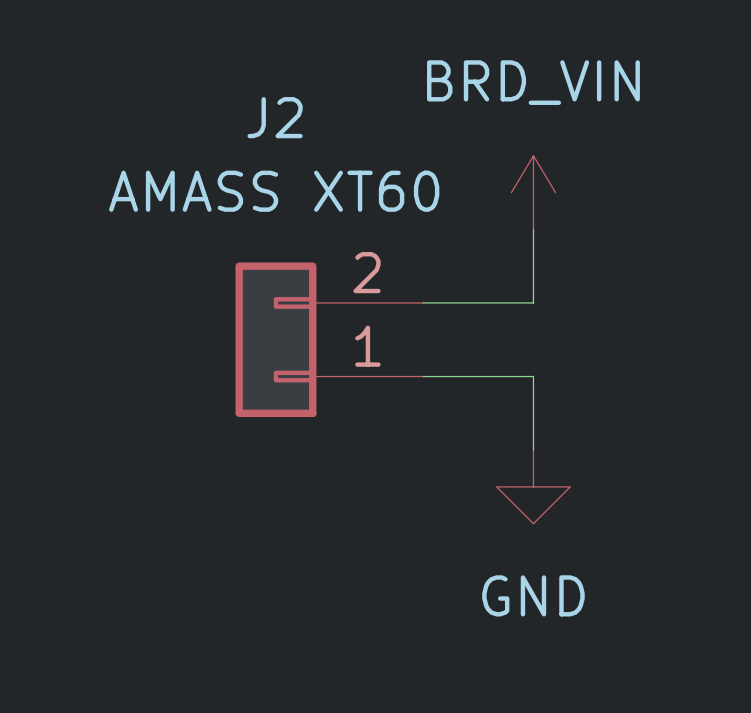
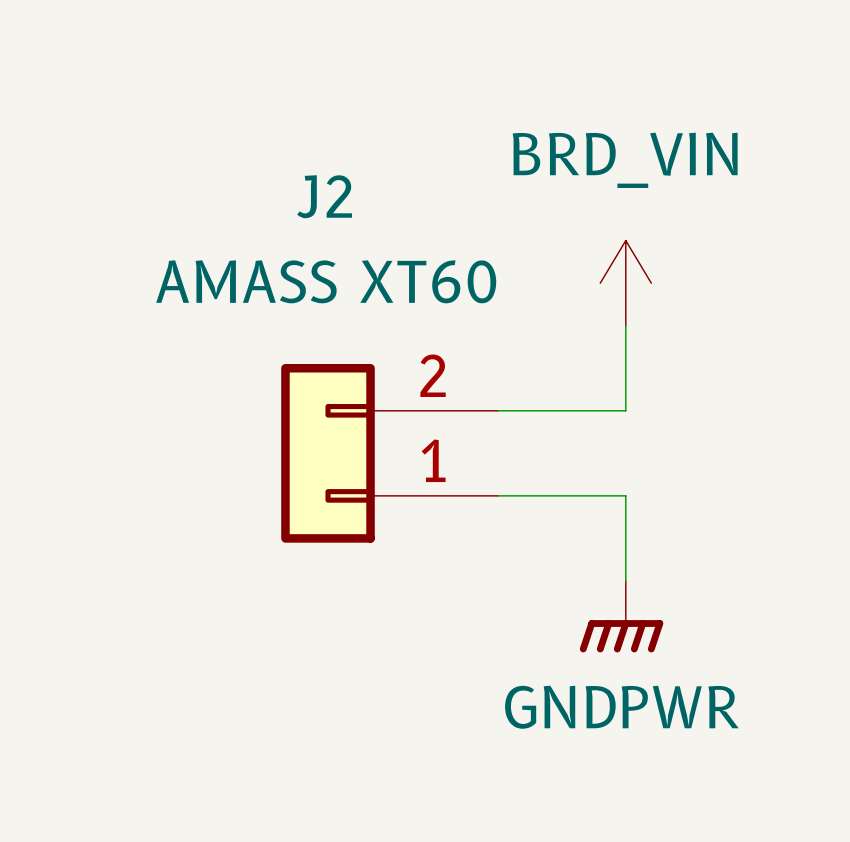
power symbol: GND (533, 486) -> GNDPWR (621, 616)

